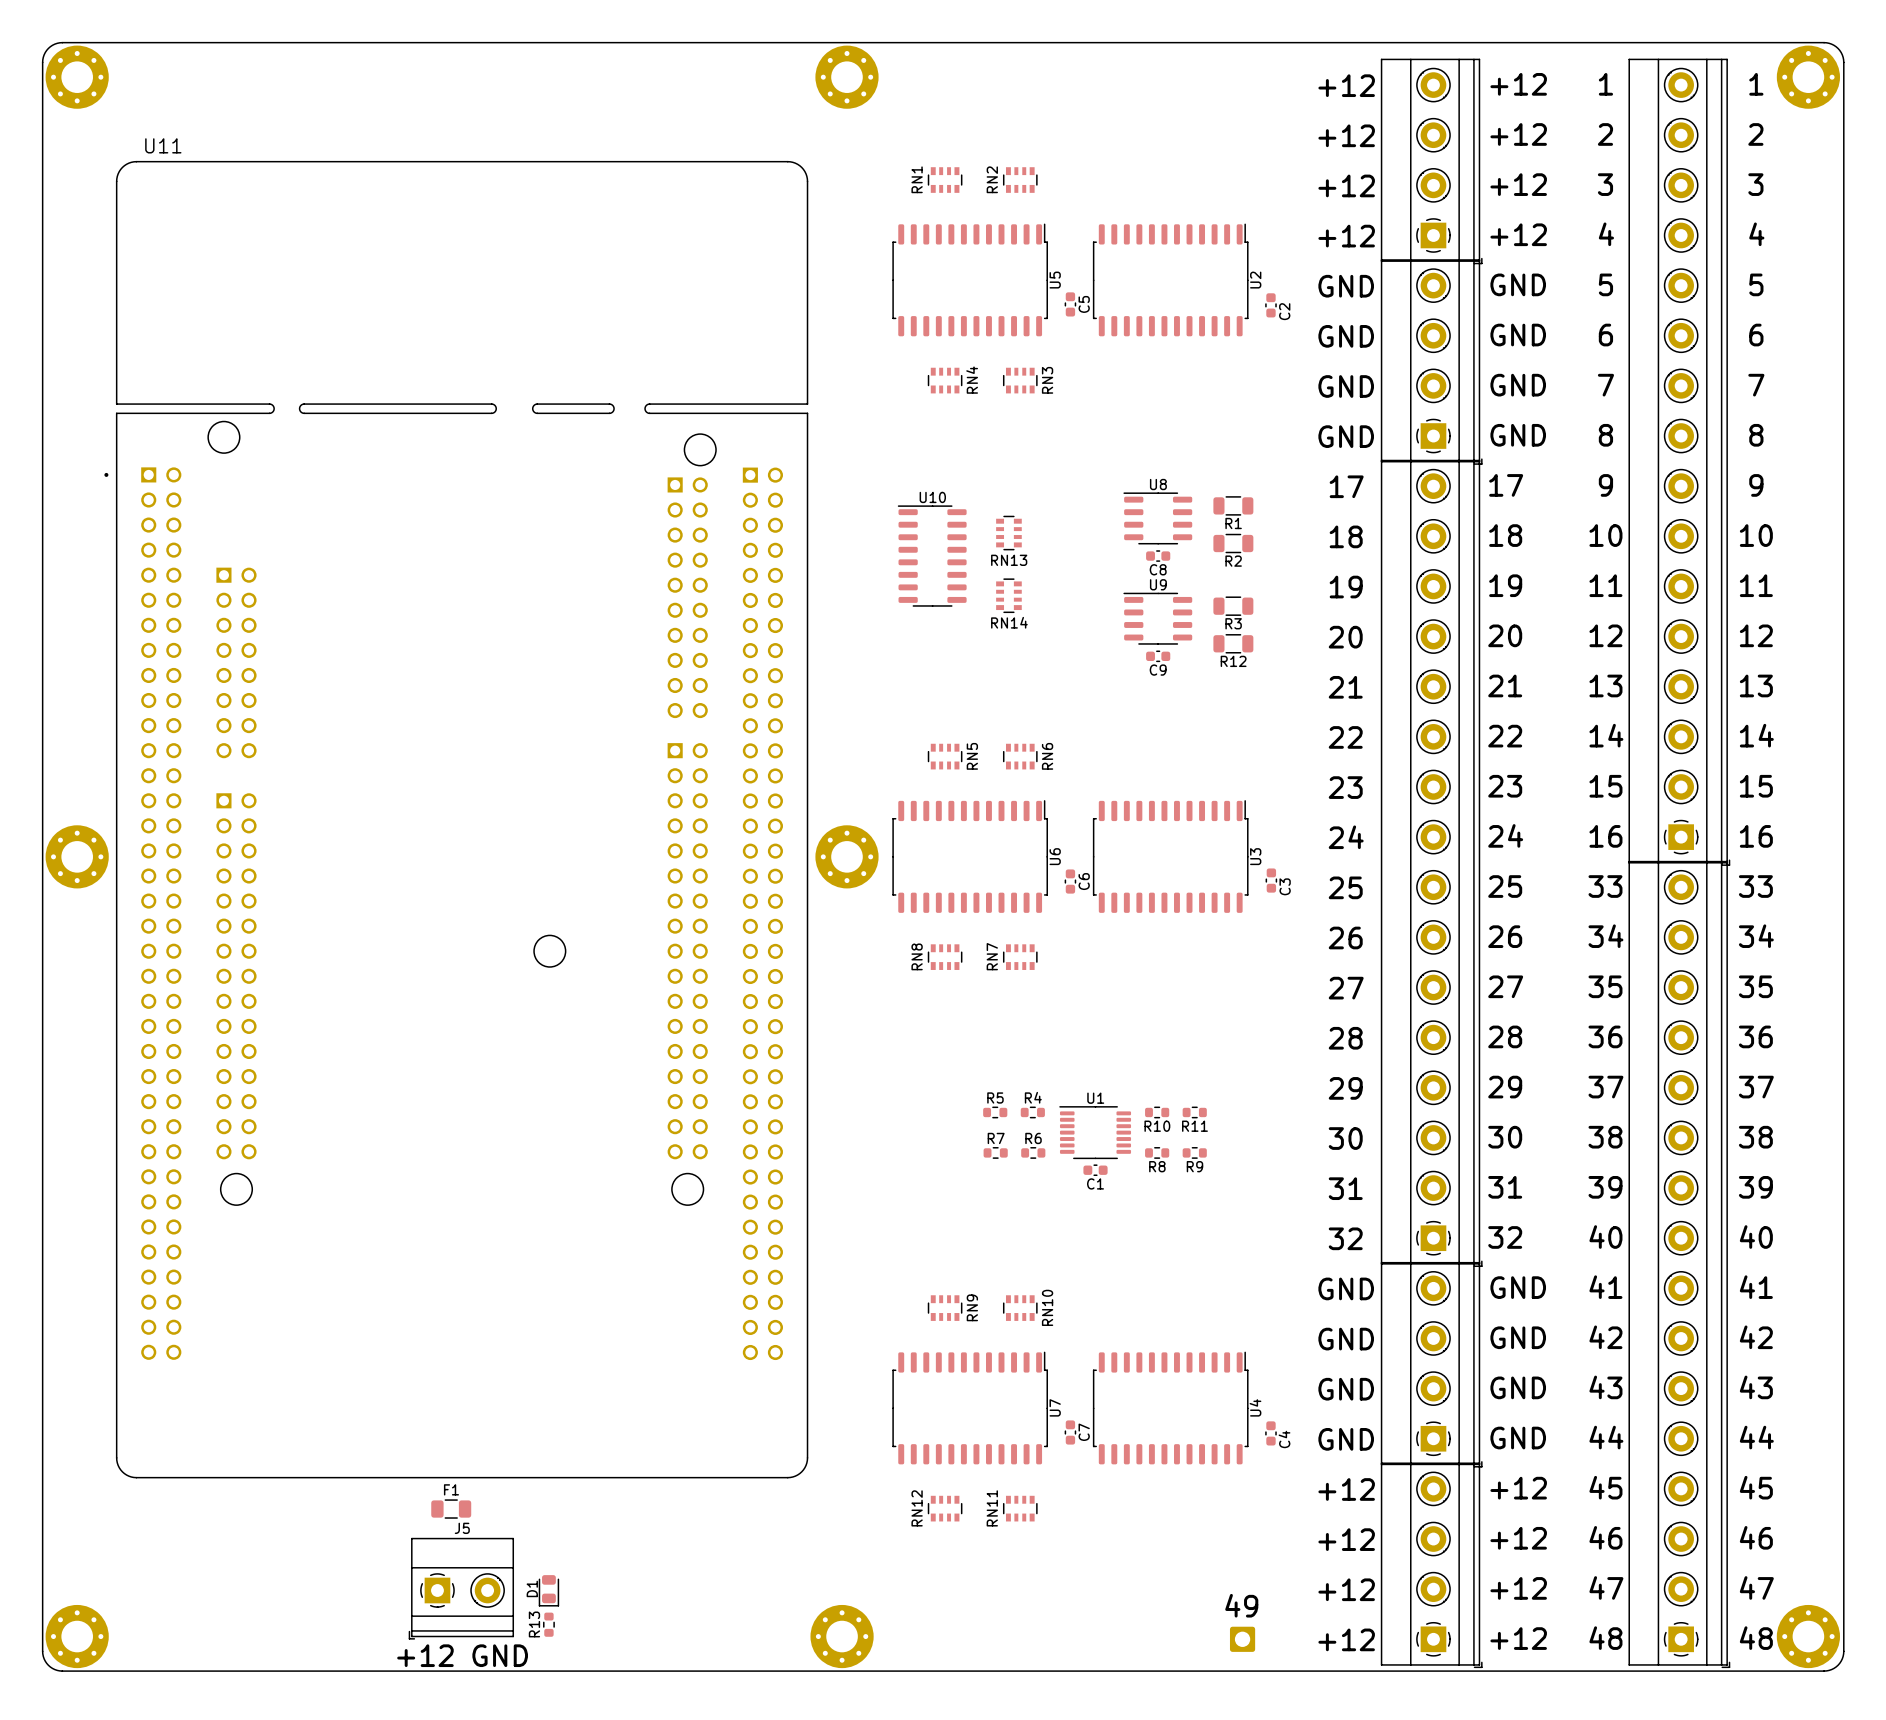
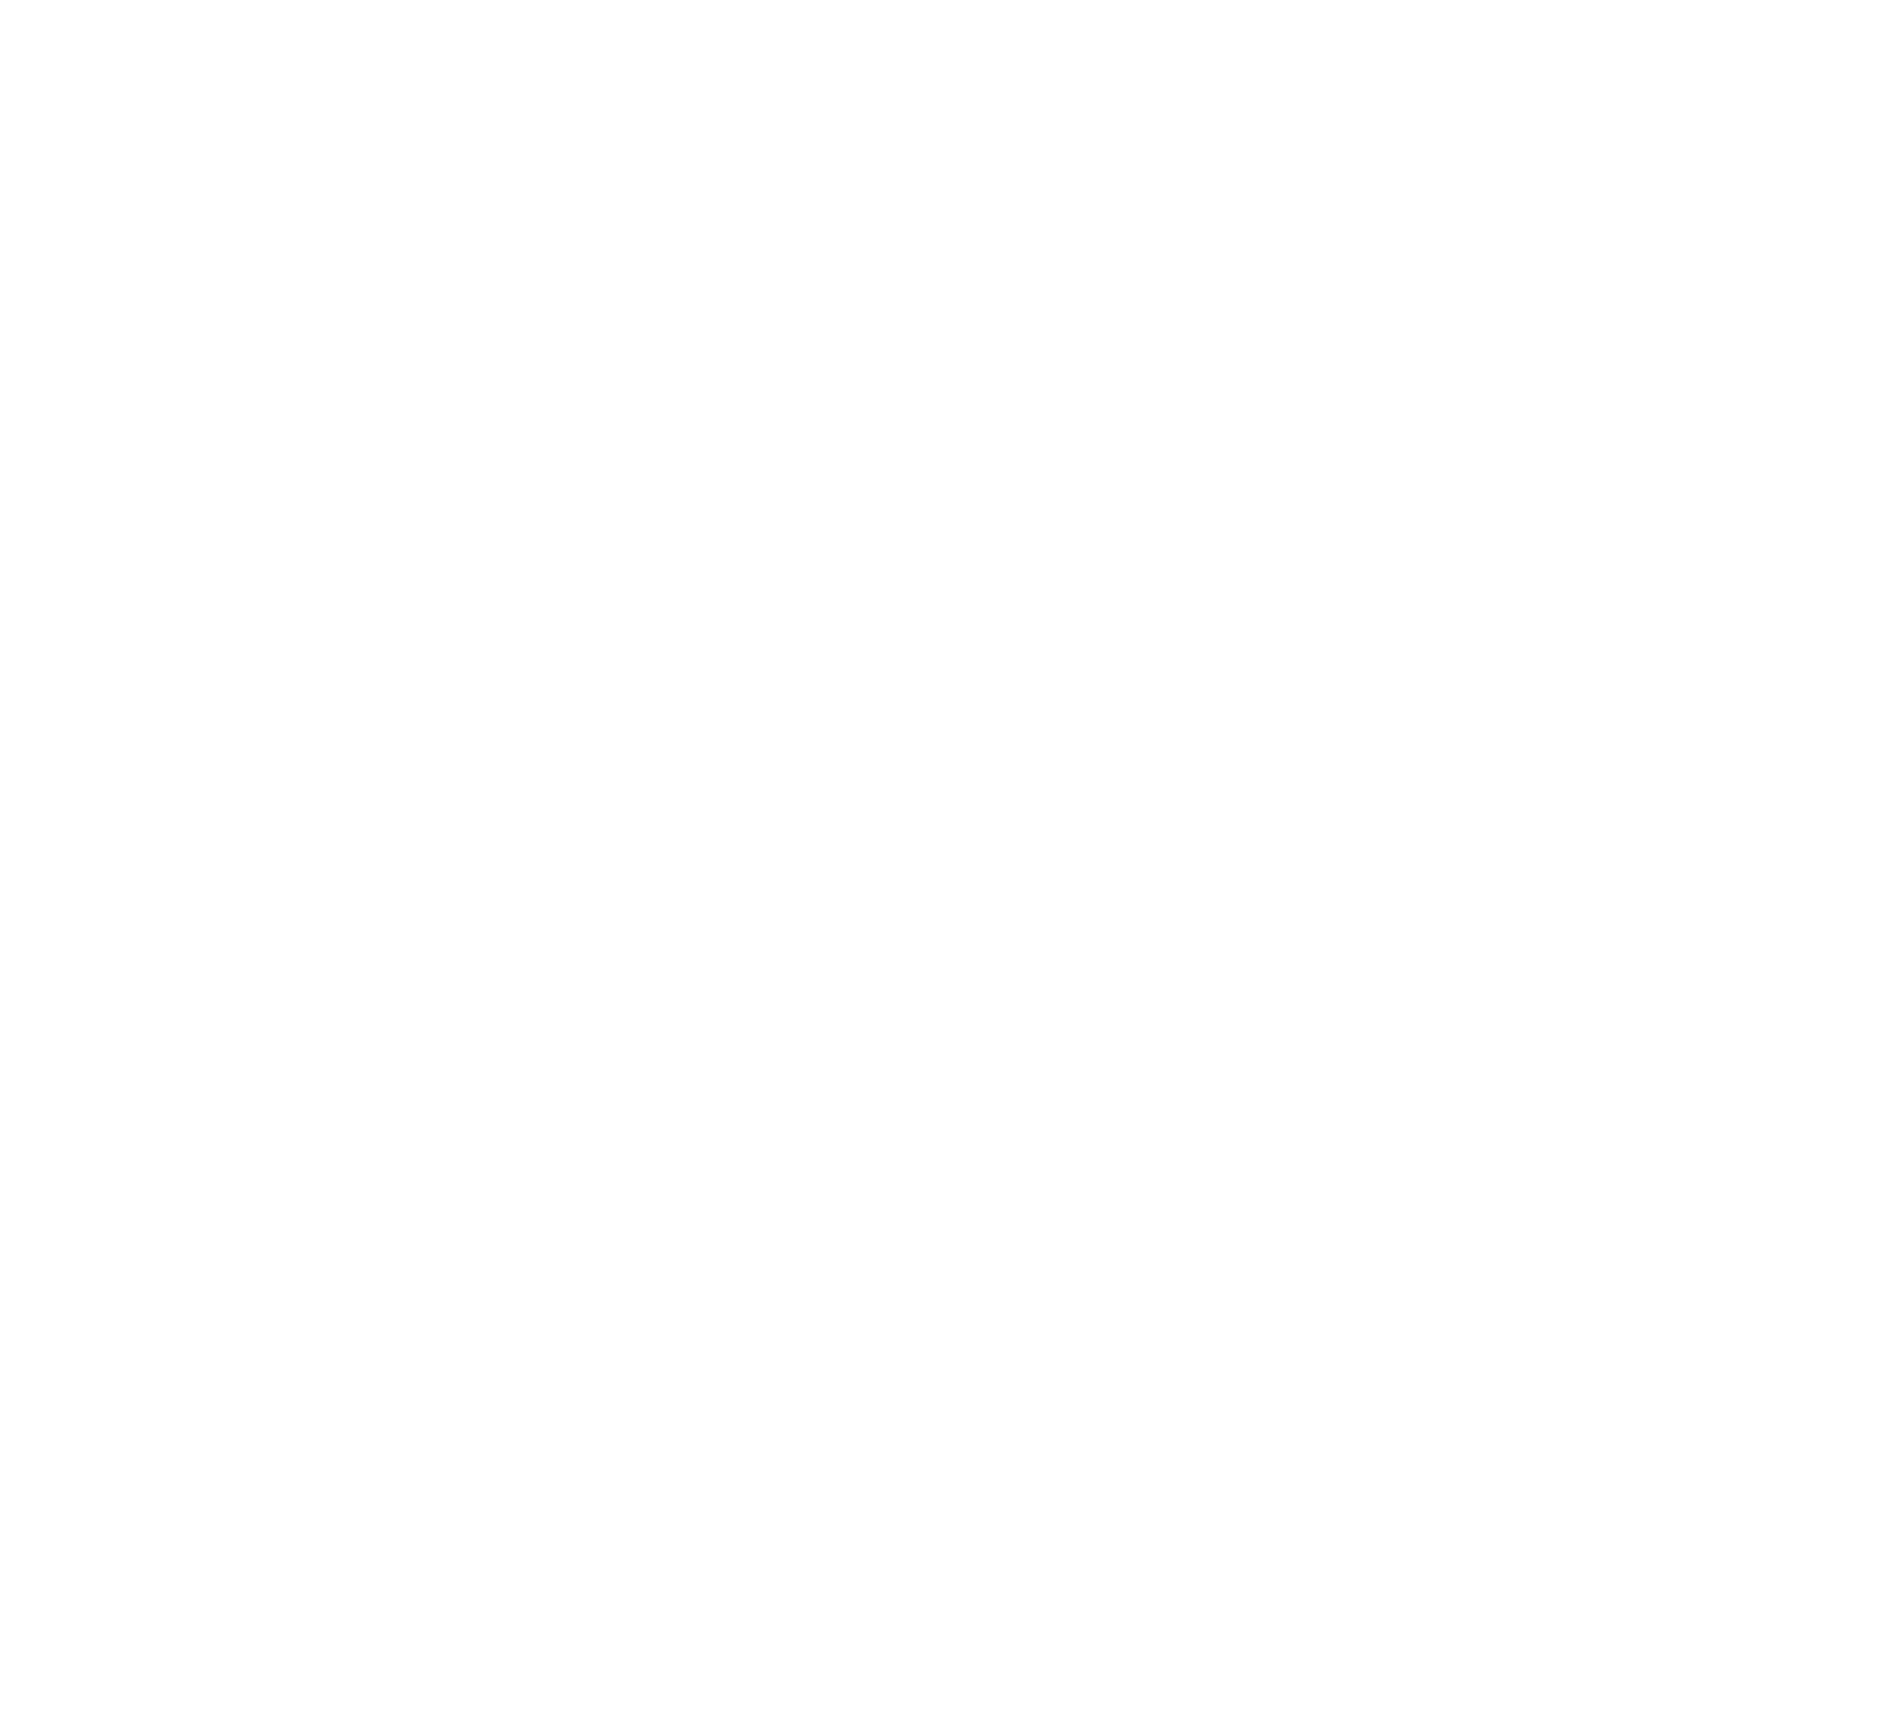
board edge: (62, 42) (1824, 42) (1831, 44) (1838, 48) (1842, 54) (1843, 62) (1843, 1651) (1842, 1658) (1838, 1665) (1831, 1669) (1824, 1671) (62, 1671) (54, 1669) (48, 1665) (44, 1658) (42, 1651) (42, 62) (44, 54) (48, 48) (54, 44) (62, 42) -> none
part: (77, 77) -> none
part: (846, 77) -> none
part: (1808, 77) -> none
text: +12 (1518, 84) -> none
text: 1 (1605, 84) -> none
text: 1 (1756, 84) -> none
text: +12 (1346, 85) -> none
text: +12 (1518, 134) -> none
text: 2 (1605, 134) -> none
text: 2 (1755, 134) -> none
text: +12 (1346, 135) -> none
part: (1431, 161) -> none
RN1: (945, 180) -> none
RN2: (1020, 180) -> none
text: +12 (1518, 184) -> none
text: 3 (1605, 184) -> none
text: 3 (1755, 184) -> none
text: +12 (1346, 185) -> none
text: +12 (1518, 234) -> none
text: 4 (1606, 234) -> none
text: 4 (1756, 234) -> none
text: +12 (1346, 236) -> none
U5: (970, 280) -> none
U2: (1170, 280) -> none
text: GND (1518, 284) -> none
text: 5 (1605, 284) -> none
text: 5 (1756, 284) -> none
text: GND (1346, 286) -> none
C5: (1070, 304) -> none
C2: (1270, 305) -> none
text: GND (1518, 335) -> none
text: 6 (1605, 335) -> none
text: 6 (1756, 335) -> none
text: GND (1346, 336) -> none
part: (1431, 362) -> none
RN4: (945, 380) -> none
RN3: (1020, 380) -> none
text: GND (1518, 385) -> none
text: 7 (1605, 385) -> none
text: 7 (1756, 385) -> none
text: GND (1346, 386) -> none
text: GND (1518, 435) -> none
text: 8 (1605, 435) -> none
text: 8 (1756, 435) -> none
text: GND (1346, 436) -> none
part: (1679, 462) -> none
text: 17 (1506, 485) -> none
text: 9 (1605, 485) -> none
text: 9 (1756, 485) -> none
text: 17 (1346, 486) -> none
R1: (1233, 505) -> none
U8: (1157, 518) -> none
RN13: (1008, 533) -> none
text: 18 (1505, 535) -> none
text: 10 (1605, 535) -> none
text: 10 (1756, 535) -> none
text: 18 (1346, 536) -> none
R2: (1233, 543) -> none
U10: (932, 556) -> none
C8: (1158, 556) -> none
text: 19 (1505, 585) -> none
text: 11 (1605, 585) -> none
text: 11 (1756, 585) -> none
text: 19 (1346, 587) -> none
RN14: (1008, 595) -> none
R3: (1233, 606) -> none
U9: (1157, 618) -> none
text: 20 (1505, 635) -> none
text: 12 (1605, 635) -> none
text: 12 (1756, 635) -> none
text: 20 (1345, 637) -> none
R12: (1233, 643) -> none
C9: (1158, 656) -> none
text: 21 (1505, 685) -> none
text: 13 (1605, 685) -> none
text: 13 (1756, 685) -> none
text: 21 (1345, 687) -> none
text: 14 (1606, 735) -> none
text: 14 (1756, 735) -> none
text: 22 (1505, 736) -> none
text: 22 (1345, 737) -> none
RN5: (945, 756) -> none
RN6: (1020, 756) -> none
text: 23 (1505, 786) -> none
text: 15 (1605, 786) -> none
text: 15 (1756, 786) -> none
text: 23 (1345, 787) -> none
U11: (456, 819) -> none
text: 24 (1505, 835) -> none
text: 16 (1605, 836) -> none
text: 16 (1756, 836) -> none
text: 24 (1346, 837) -> none
part: (77, 856) -> none
part: (846, 856) -> none
U6: (970, 856) -> none
U3: (1170, 856) -> none
part: (1431, 863) -> none
C3: (1271, 880) -> none
C6: (1070, 881) -> none
text: 25 (1505, 886) -> none
text: 33 (1605, 886) -> none
text: 33 (1755, 886) -> none
text: 25 (1345, 887) -> none
text: 26 (1505, 936) -> none
text: 34 (1605, 936) -> none
text: 34 (1756, 936) -> none
text: 26 (1345, 937) -> none
RN8: (945, 957) -> none
RN7: (1020, 957) -> none
text: 27 (1505, 986) -> none
text: 35 (1605, 986) -> none
text: 35 (1755, 986) -> none
text: 27 (1346, 988) -> none
text: 28 (1505, 1036) -> none
text: 36 (1605, 1036) -> none
text: 36 (1755, 1036) -> none
text: 28 (1345, 1038) -> none
text: 29 (1505, 1087) -> none
text: 37 (1605, 1087) -> none
text: 37 (1756, 1087) -> none
text: 29 (1345, 1088) -> none
R5: (995, 1112) -> none
R4: (1032, 1112) -> none
R10: (1157, 1112) -> none
R11: (1194, 1112) -> none
U1: (1095, 1132) -> none
text: 30 (1505, 1137) -> none
text: 38 (1605, 1137) -> none
text: 38 (1755, 1137) -> none
text: 30 (1345, 1138) -> none
R7: (995, 1152) -> none
R6: (1033, 1152) -> none
R8: (1157, 1152) -> none
R9: (1194, 1152) -> none
C1: (1095, 1170) -> none
text: 31 (1505, 1187) -> none
text: 39 (1605, 1187) -> none
text: 39 (1755, 1187) -> none
text: 31 (1345, 1188) -> none
text: 32 (1505, 1237) -> none
text: 40 (1605, 1237) -> none
text: 40 (1756, 1237) -> none
text: 32 (1345, 1238) -> none
part: (1679, 1264) -> none
text: GND (1518, 1287) -> none
text: 41 (1605, 1287) -> none
text: 41 (1756, 1287) -> none
text: GND (1346, 1288) -> none
RN9: (945, 1308) -> none
RN10: (1020, 1308) -> none
text: GND (1518, 1337) -> none
text: 42 (1605, 1337) -> none
text: 42 (1756, 1337) -> none
text: GND (1346, 1339) -> none
part: (1431, 1364) -> none
text: GND (1518, 1387) -> none
text: 43 (1605, 1387) -> none
text: 43 (1756, 1387) -> none
text: GND (1346, 1389) -> none
U7: (970, 1408) -> none
U4: (1170, 1408) -> none
C7: (1070, 1432) -> none
C4: (1270, 1433) -> none
text: 44 (1606, 1437) -> none
text: 44 (1756, 1437) -> none
text: GND (1518, 1438) -> none
text: GND (1346, 1439) -> none
text: 45 (1605, 1487) -> none
text: 45 (1756, 1487) -> none
text: +12 (1518, 1488) -> none
text: +12 (1346, 1489) -> none
RN12: (945, 1508) -> none
RN11: (1020, 1508) -> none
F1: (451, 1509) -> none
text: 46 (1605, 1537) -> none
text: 46 (1756, 1537) -> none
text: +12 (1518, 1538) -> none
text: +12 (1346, 1539) -> none
part: (1431, 1565) -> none
text: 47 (1606, 1587) -> none
text: 47 (1756, 1587) -> none
J5: (461, 1588) -> none
text: +12 (1518, 1588) -> none
text: +12 (1346, 1589) -> none
D1: (548, 1590) -> none
text: 49 (1241, 1605) -> none
R13: (548, 1624) -> none
part: (77, 1636) -> none
part: (842, 1636) -> none
part: (1808, 1636) -> none
text: +12 (1518, 1638) -> none
text: 48 (1605, 1638) -> none
text: 48 (1756, 1638) -> none
part: (1242, 1639) -> none
text: +12 (1346, 1639) -> none
text: +12 (425, 1655) -> none
text: GND (500, 1655) -> none

